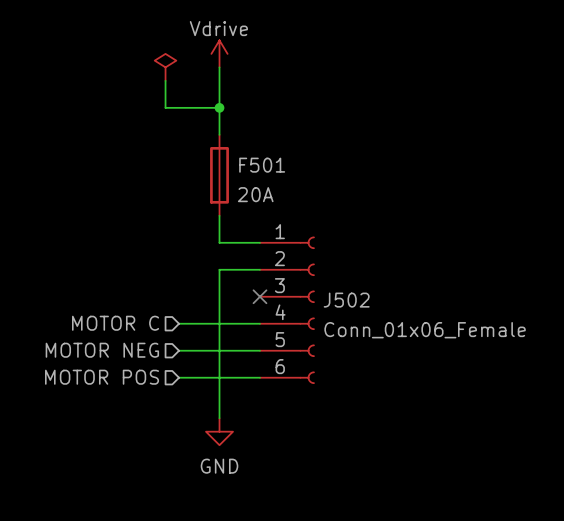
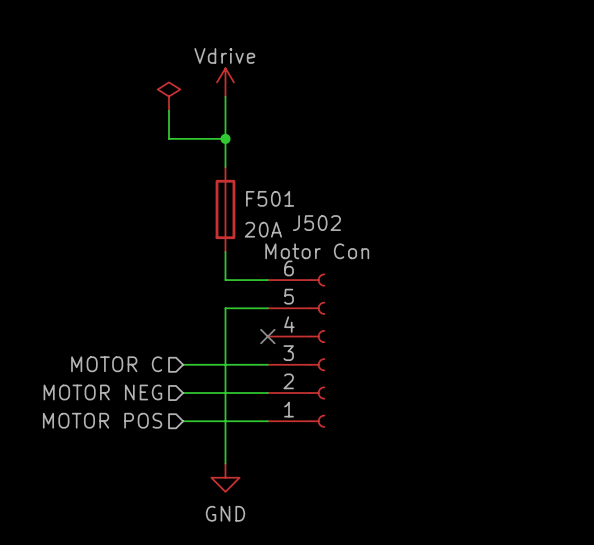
J502 name position: J502 (346, 300) -> J502 (316, 223)
J502 flip: as is (307, 310) -> up-down (317, 350)
J502 value: Conn_01x06_Female (425, 330) -> Motor Con (317, 251)

